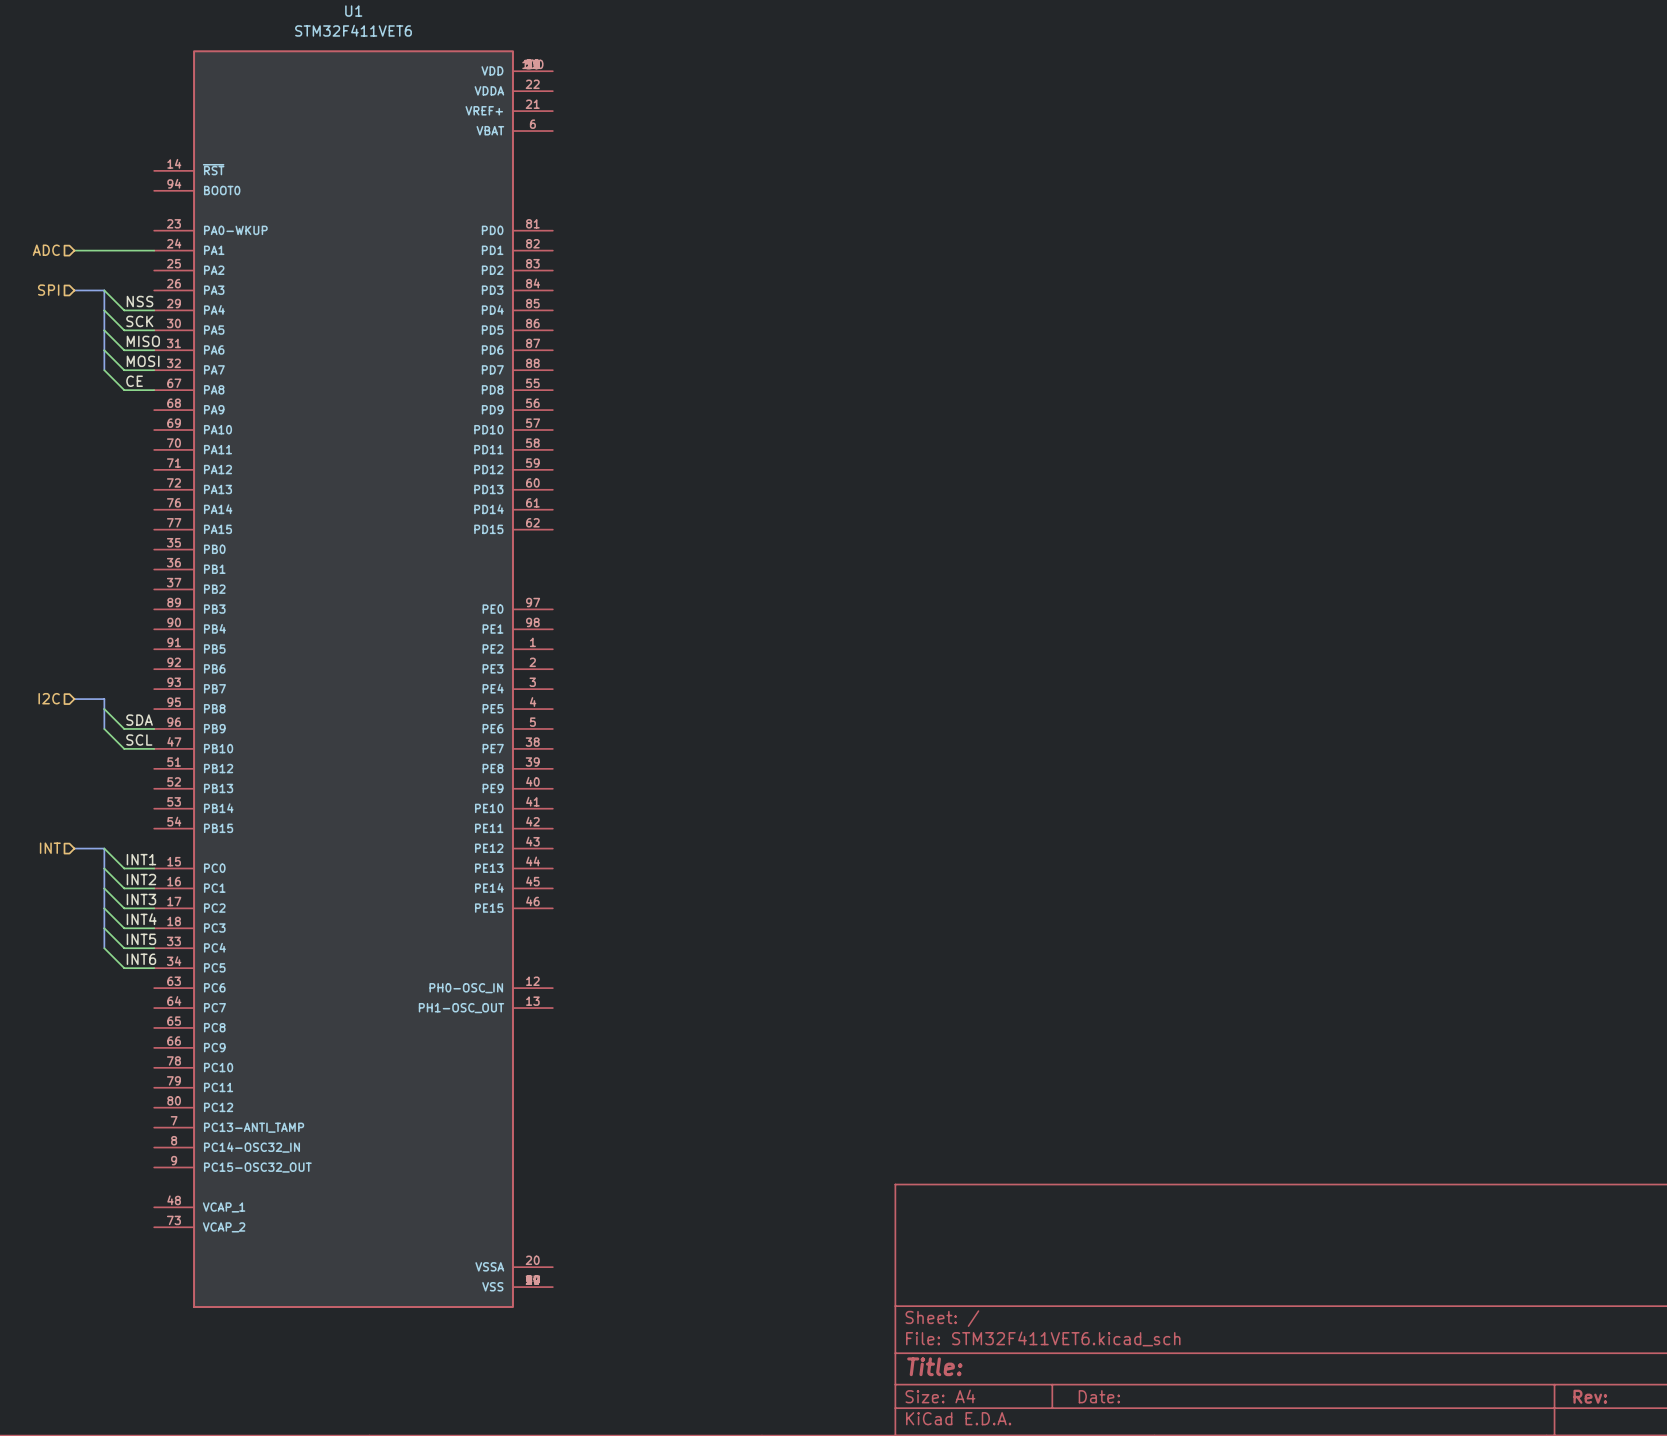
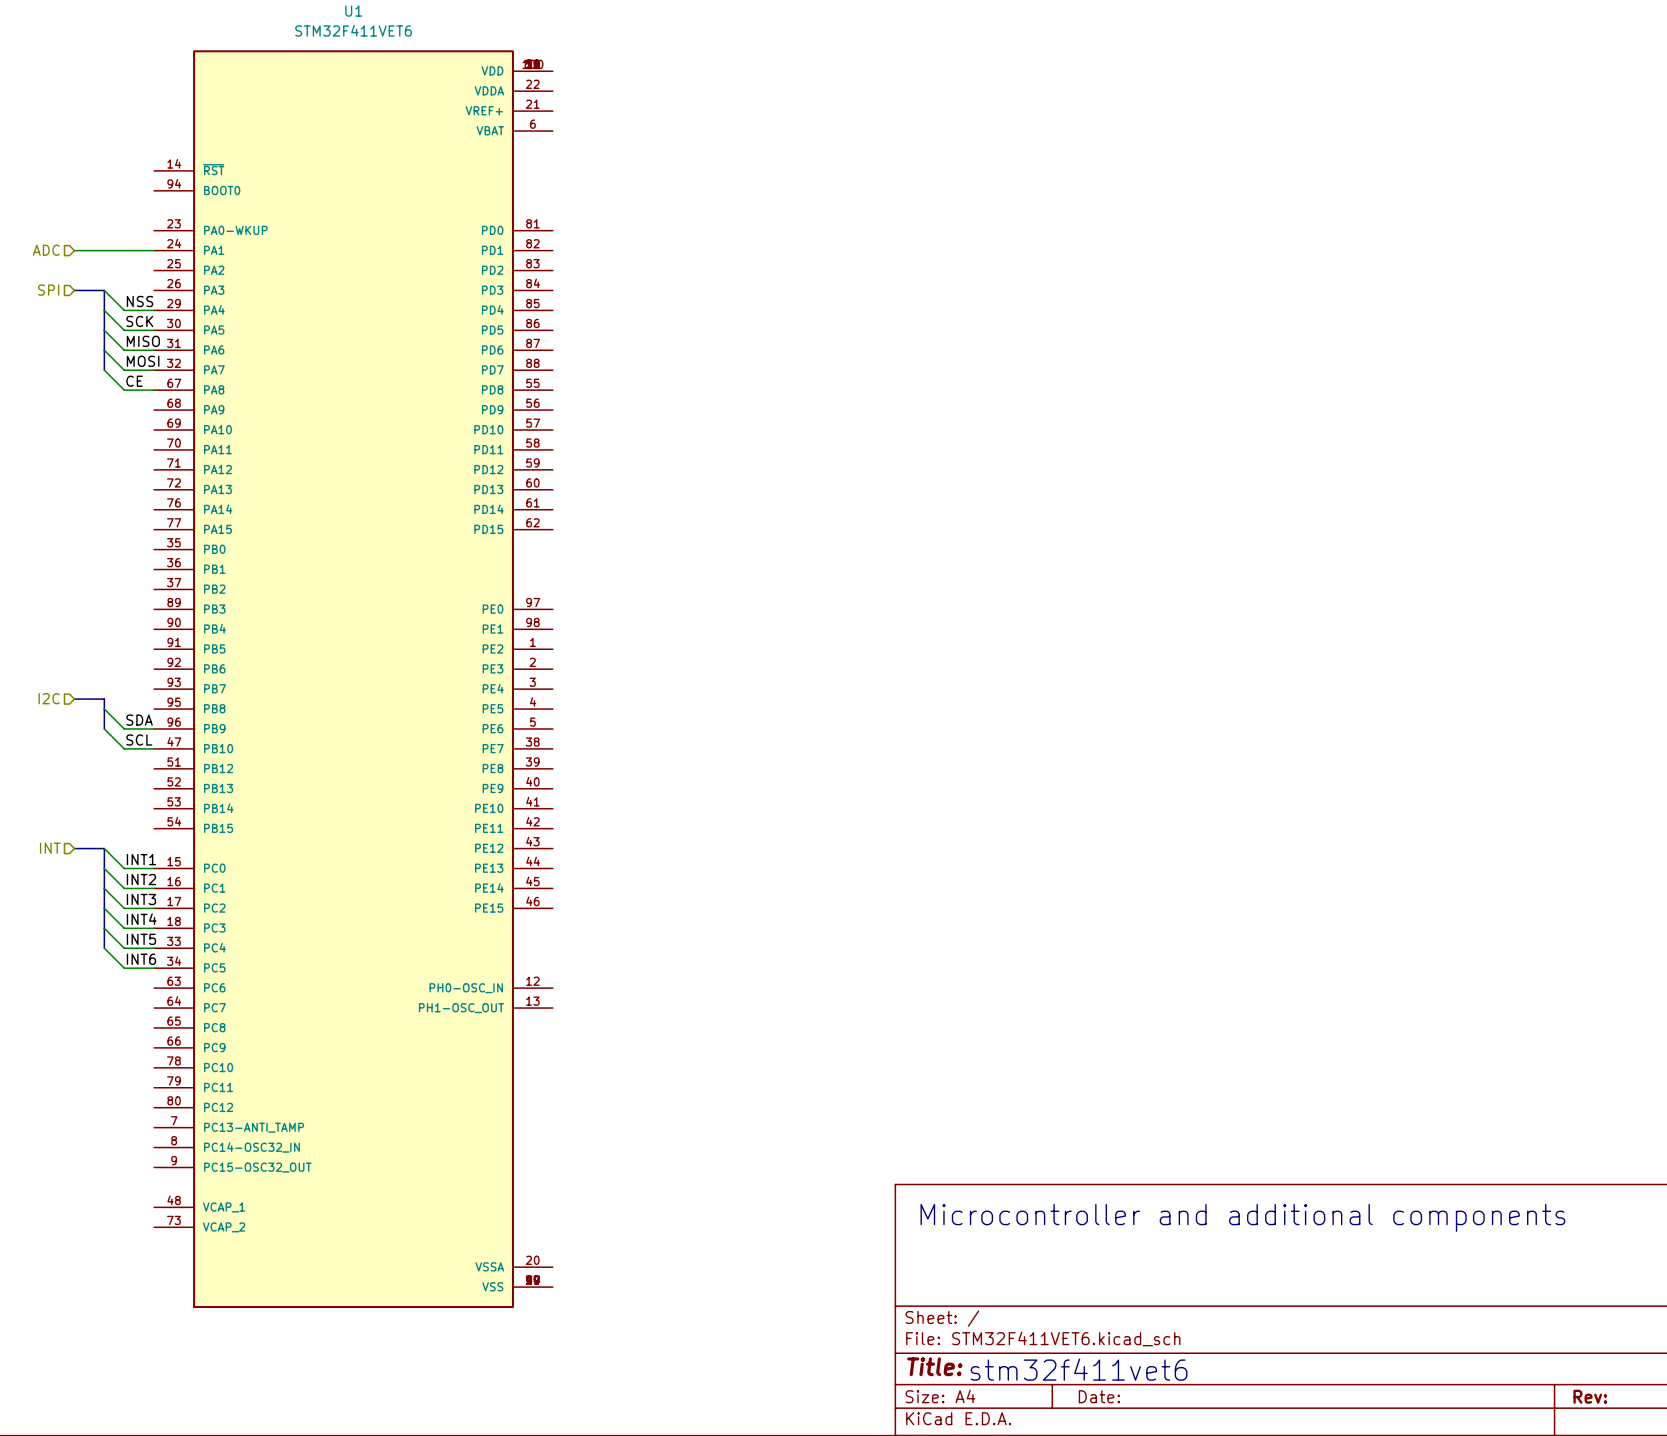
text: none -> Microcontroller and additional components (1242, 1217)
text: none -> stm32f411vet6 (1079, 1369)

